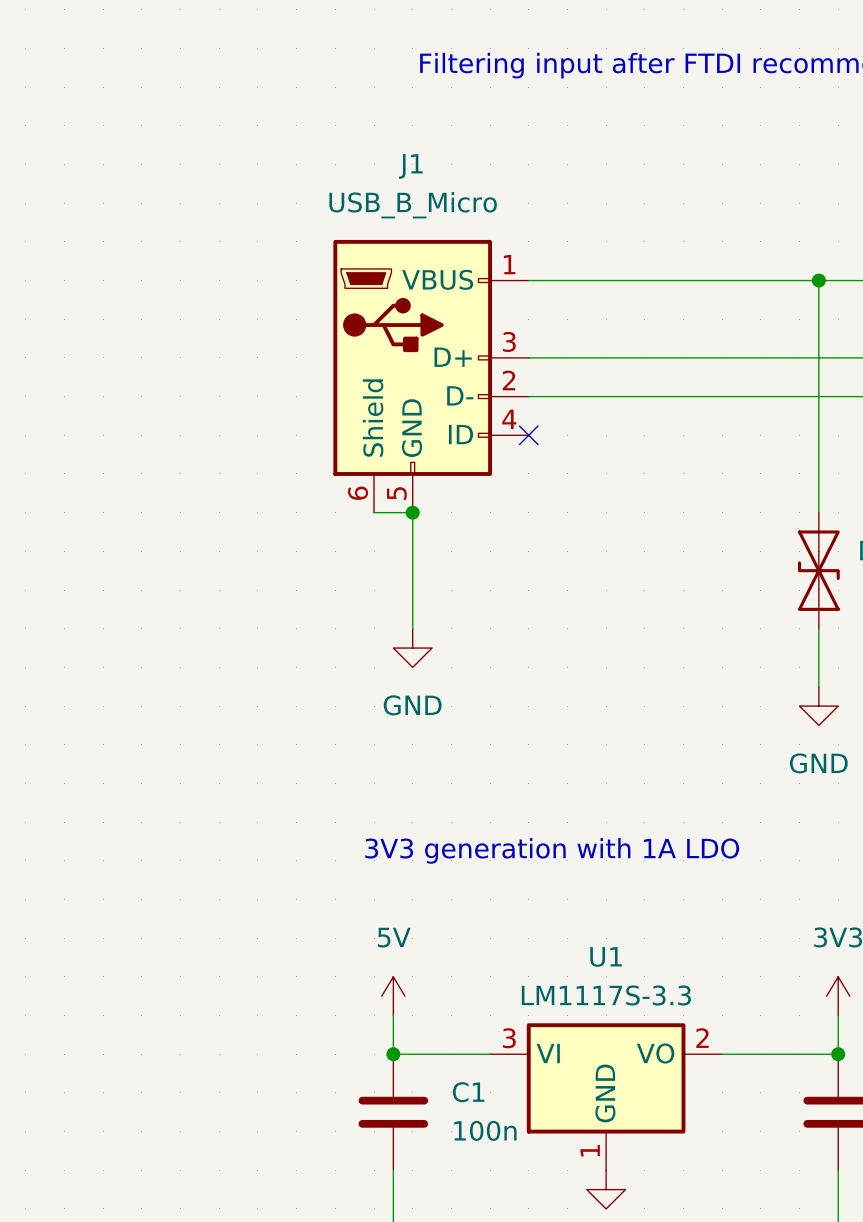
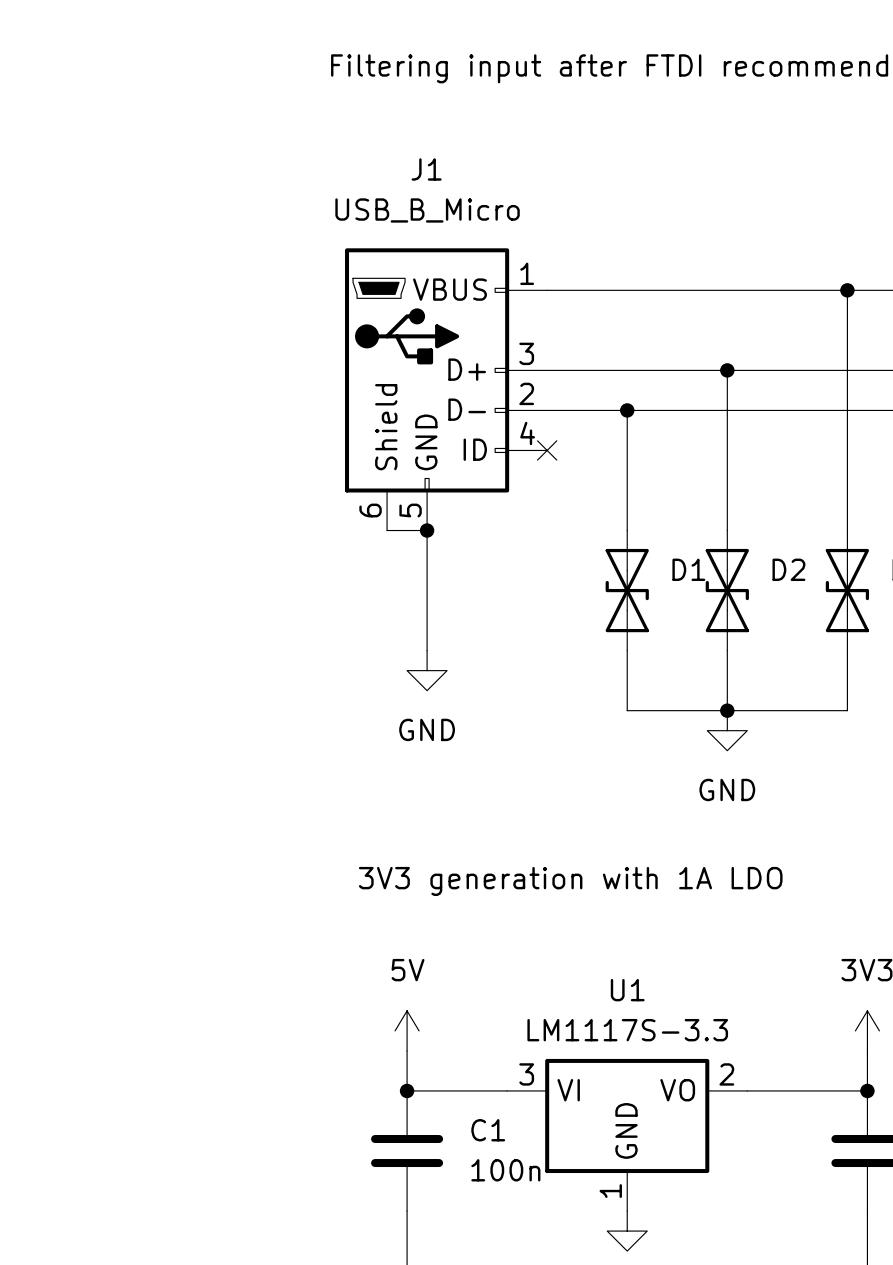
wire: none -> (727, 370) (727, 530)
junction: none -> (727, 370)
wire: none -> (627, 410) (627, 530)
junction: none -> (627, 410)
D1: none -> (627, 590)
D2: none -> (727, 590)
wire: none -> (627, 650) (627, 710) (847, 710)
wire: none -> (727, 650) (727, 710)
junction: none -> (727, 710)
power symbol position: GND (818, 706) -> GND (727, 730)

